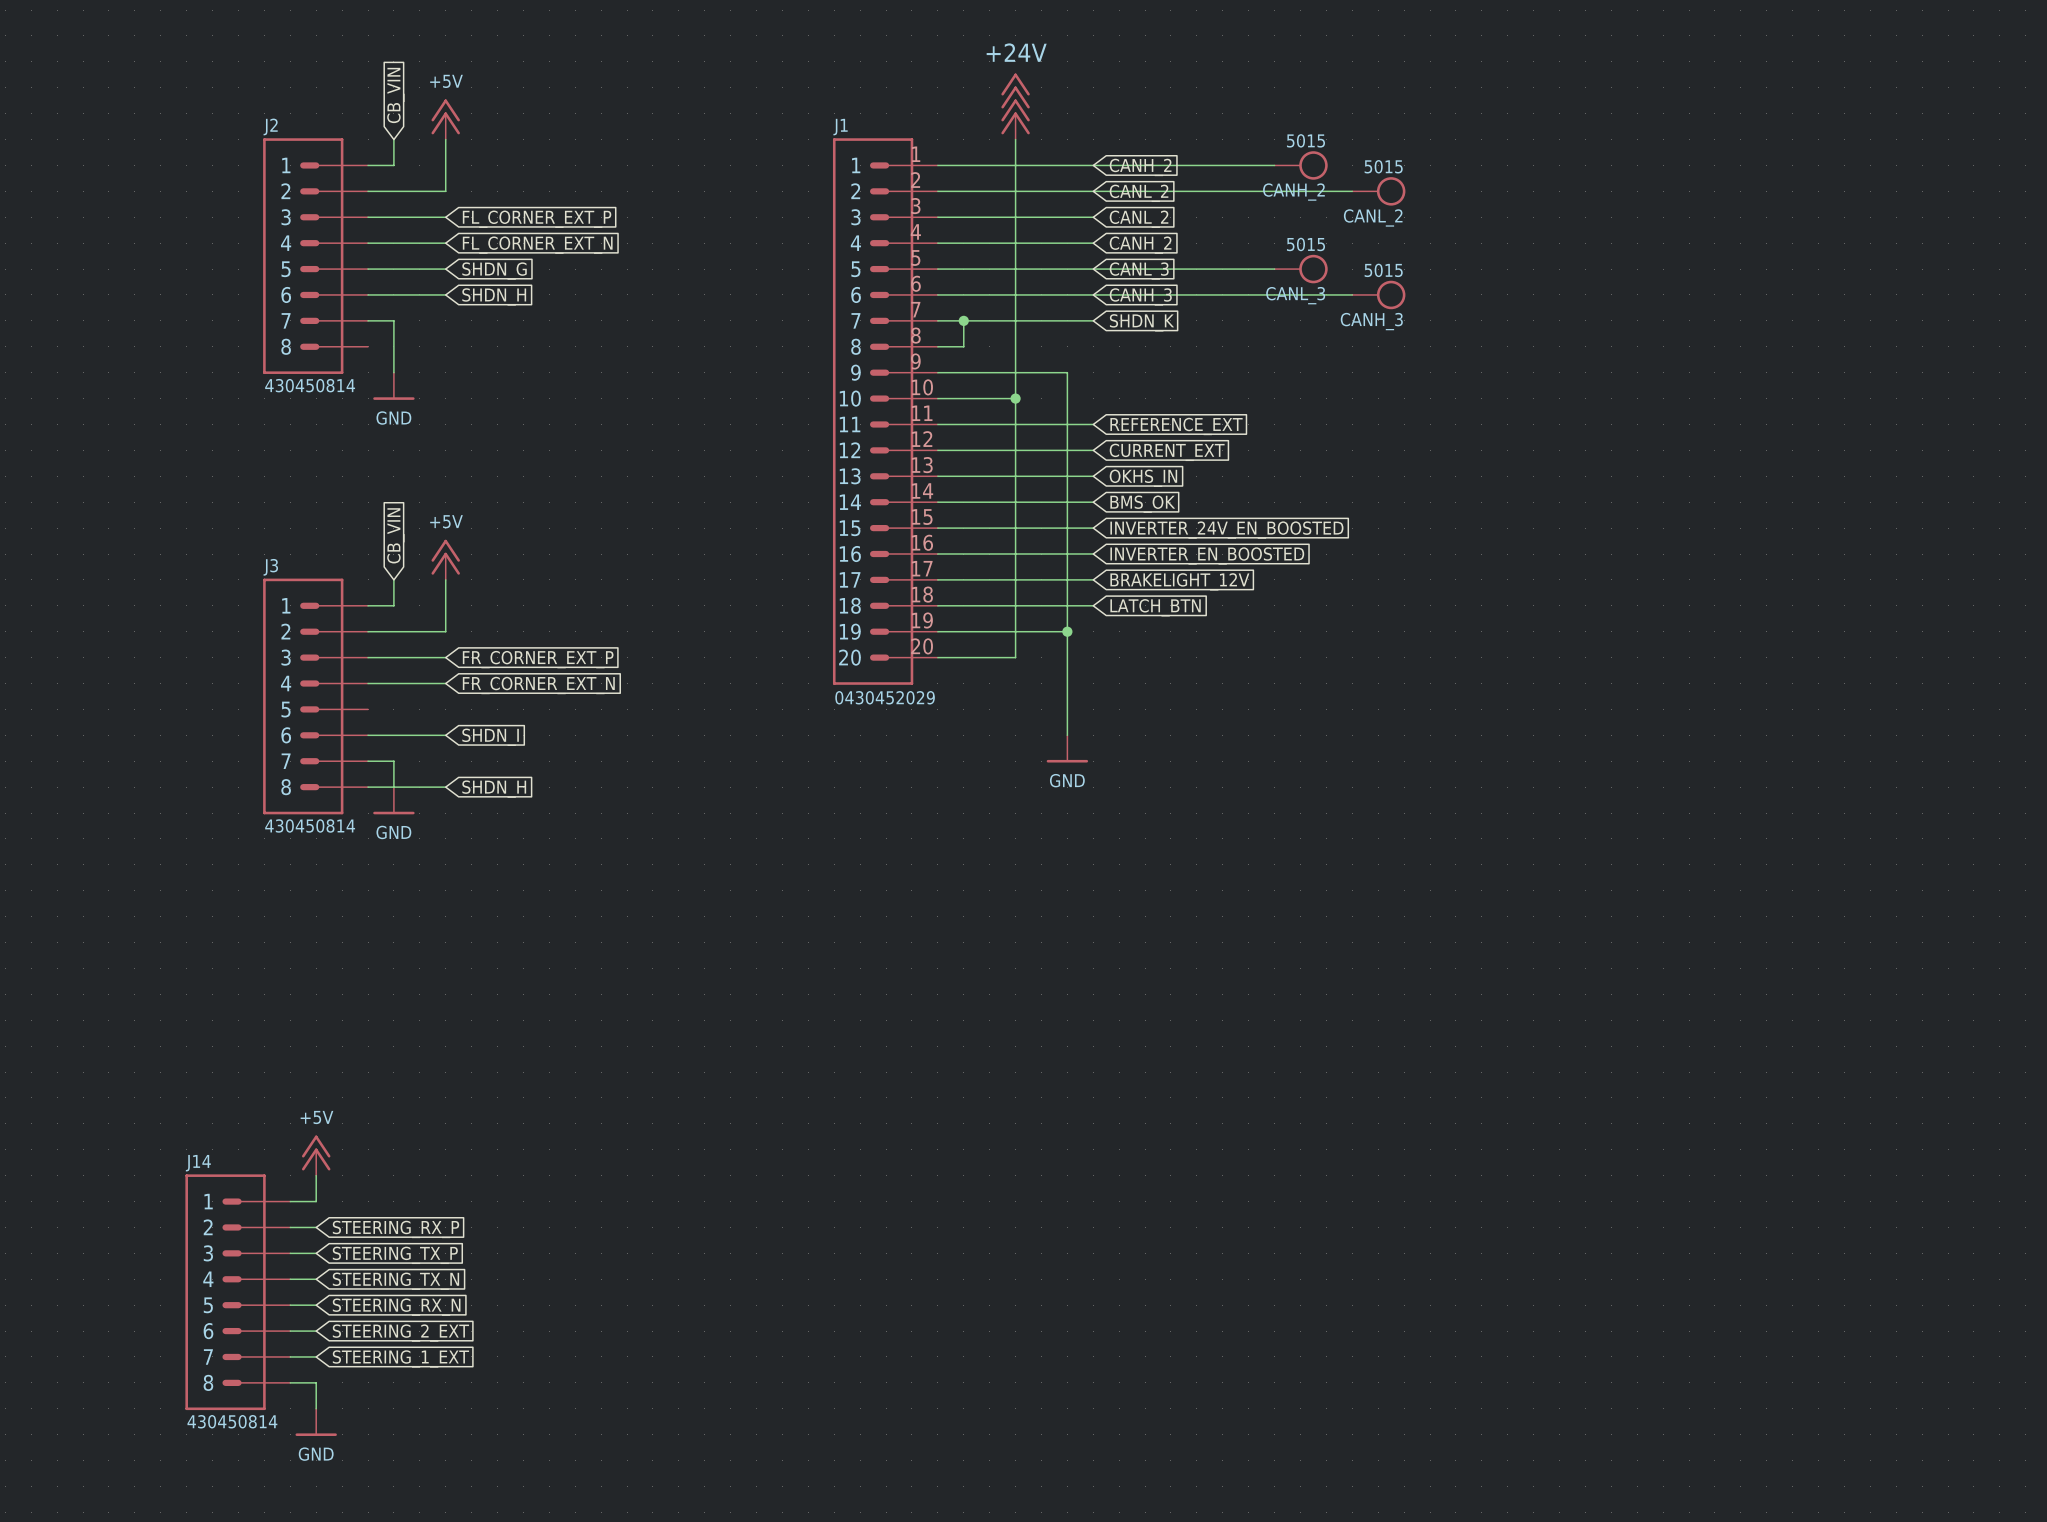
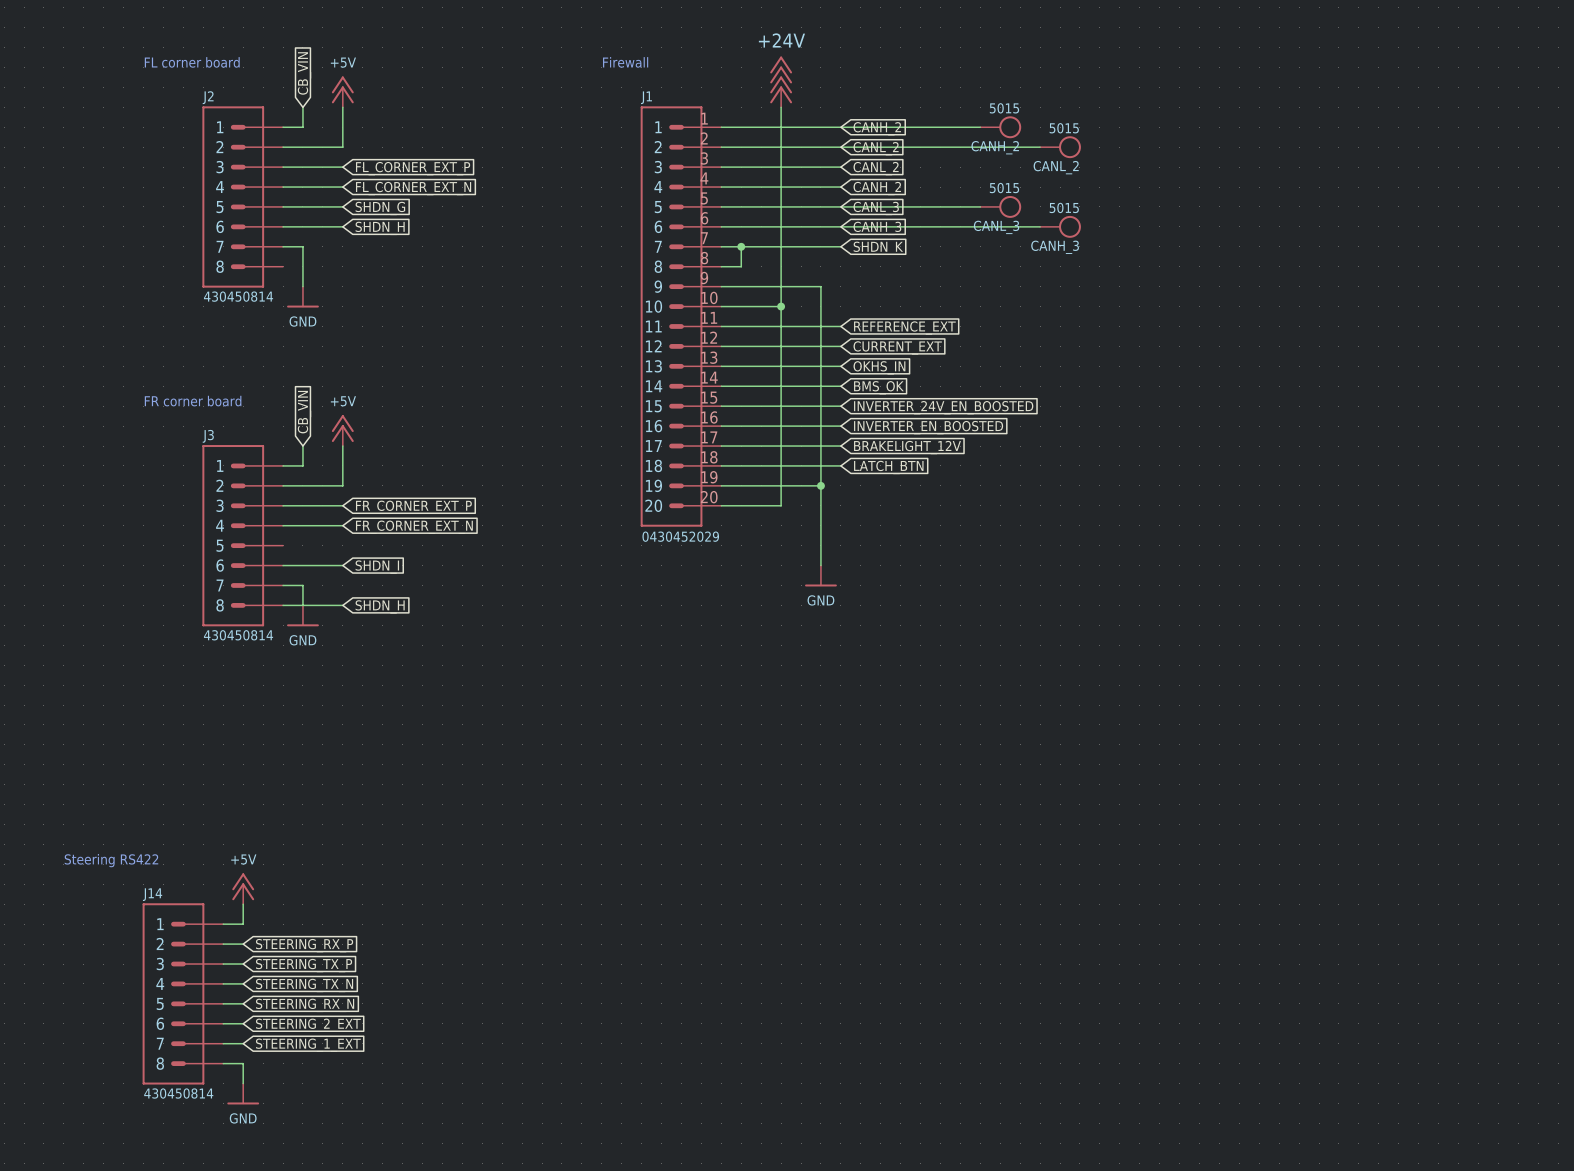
text: none -> FL corner board (192, 62)
text: none -> Firewall (625, 62)
text: none -> FR corner board (193, 401)
text: none -> Steering RS422 (111, 860)

